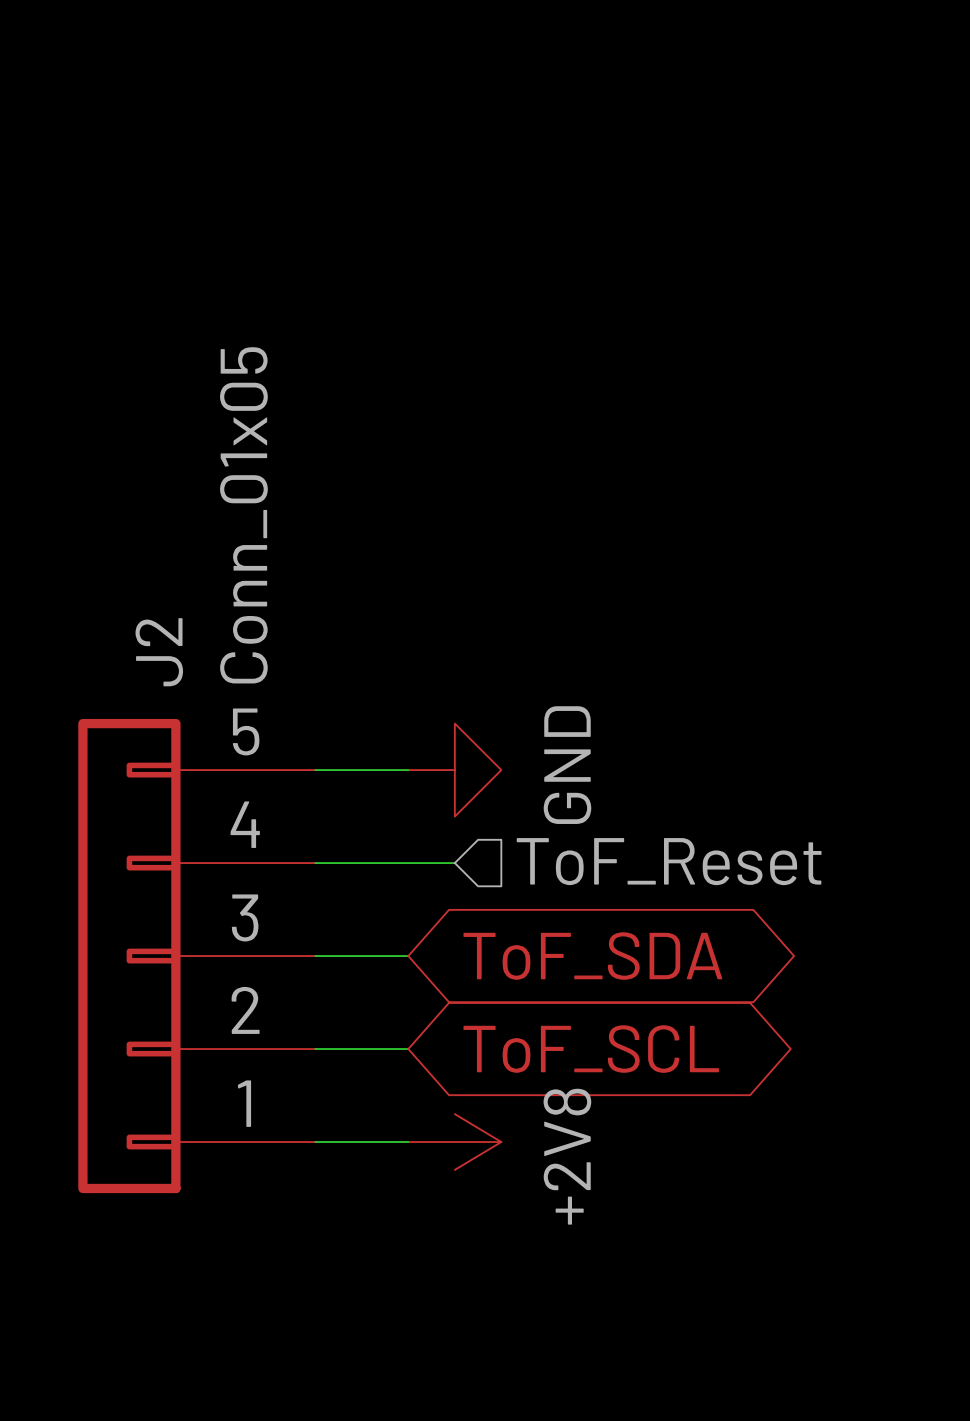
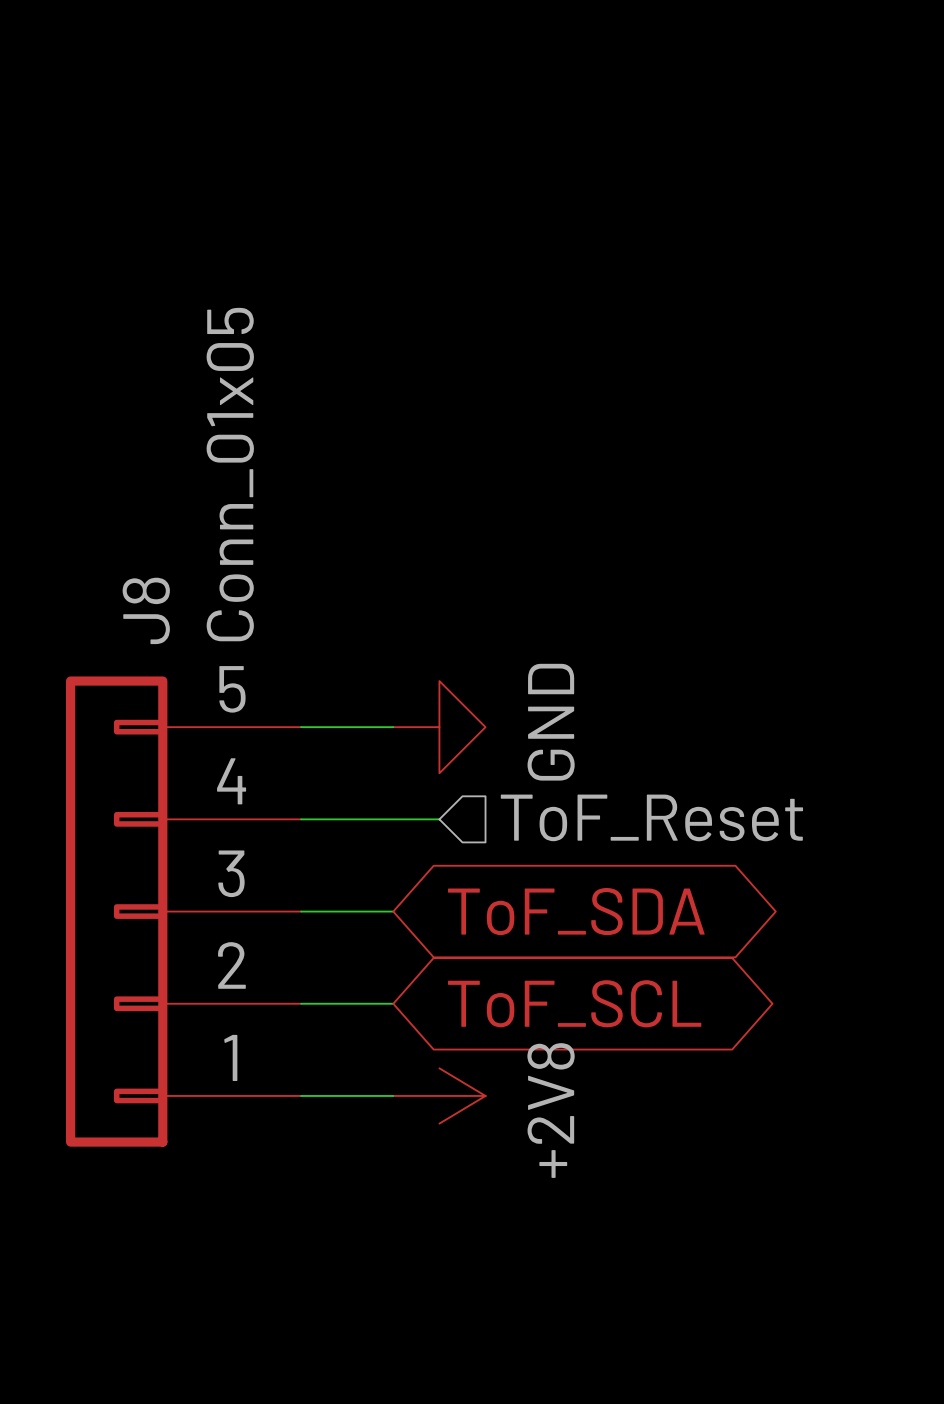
J2 name: J2 (159, 652) -> J8 (146, 610)

